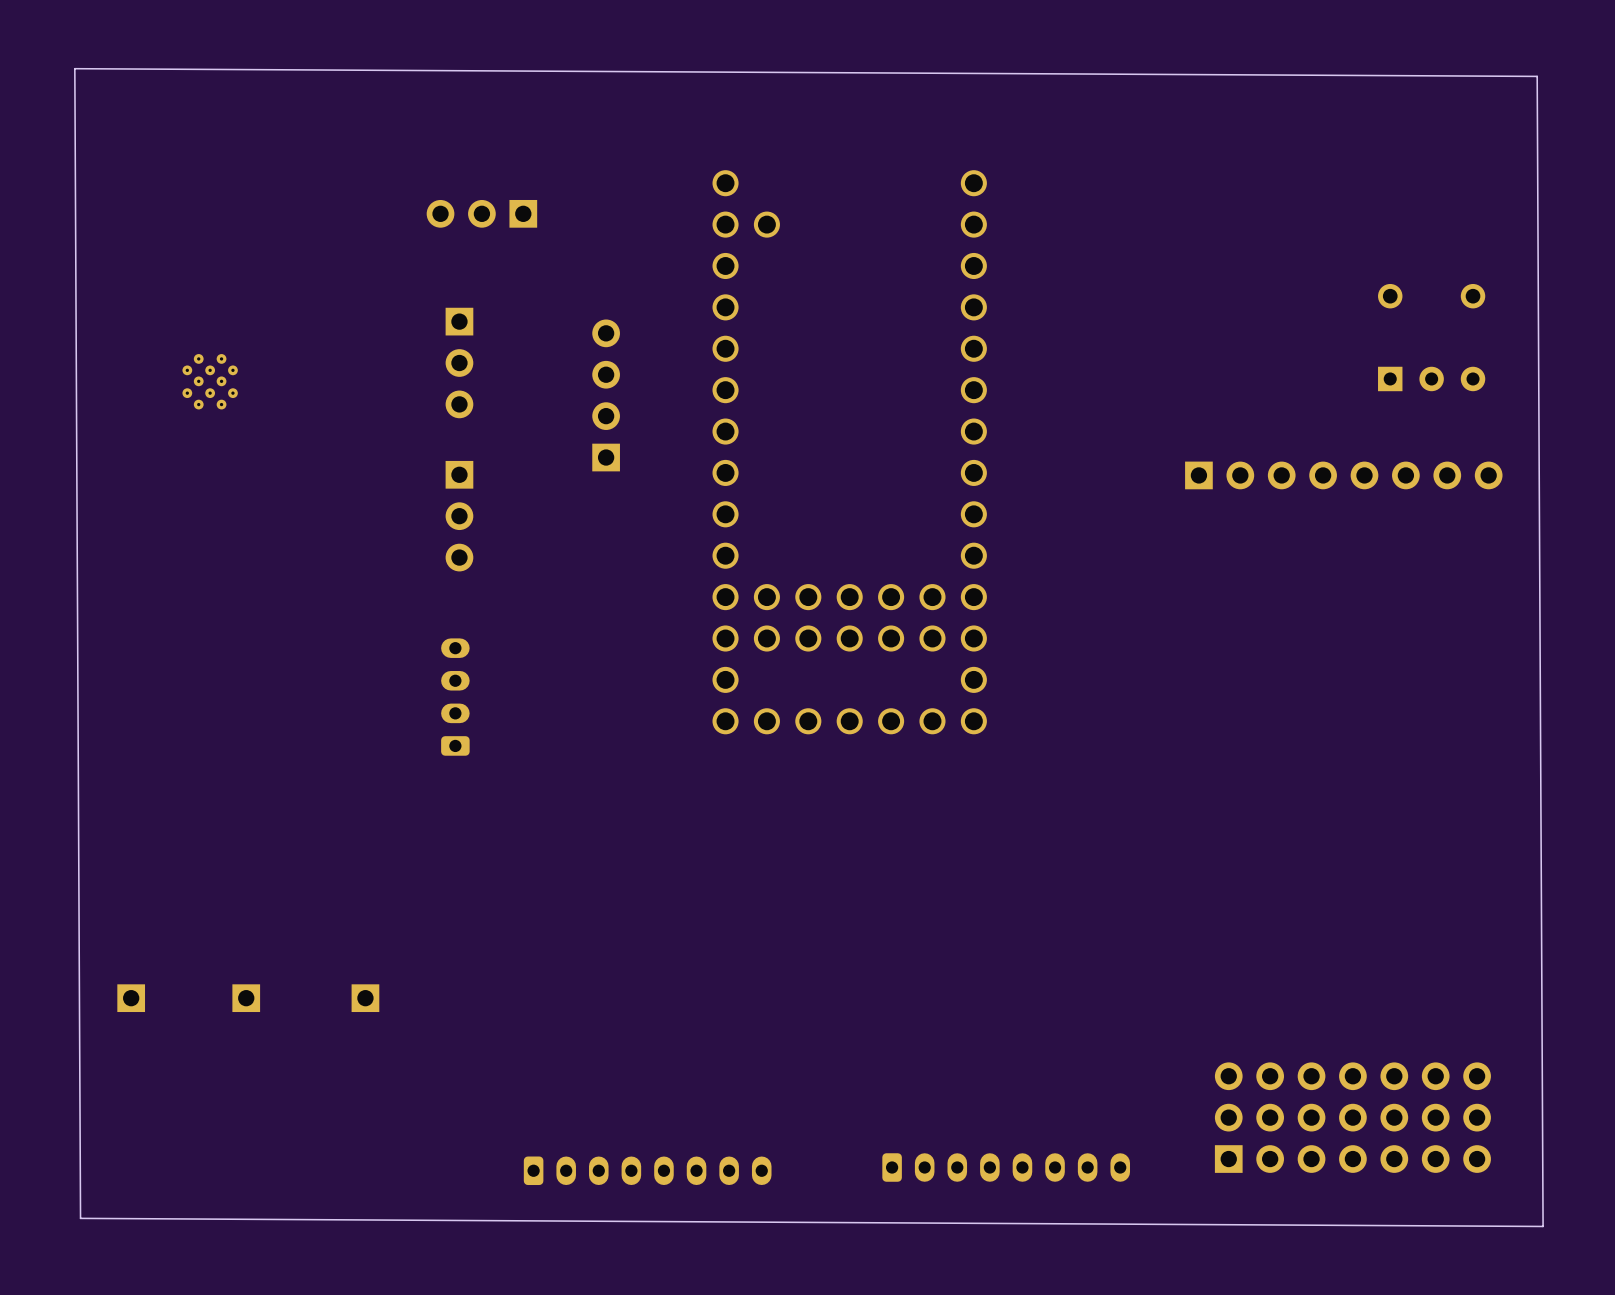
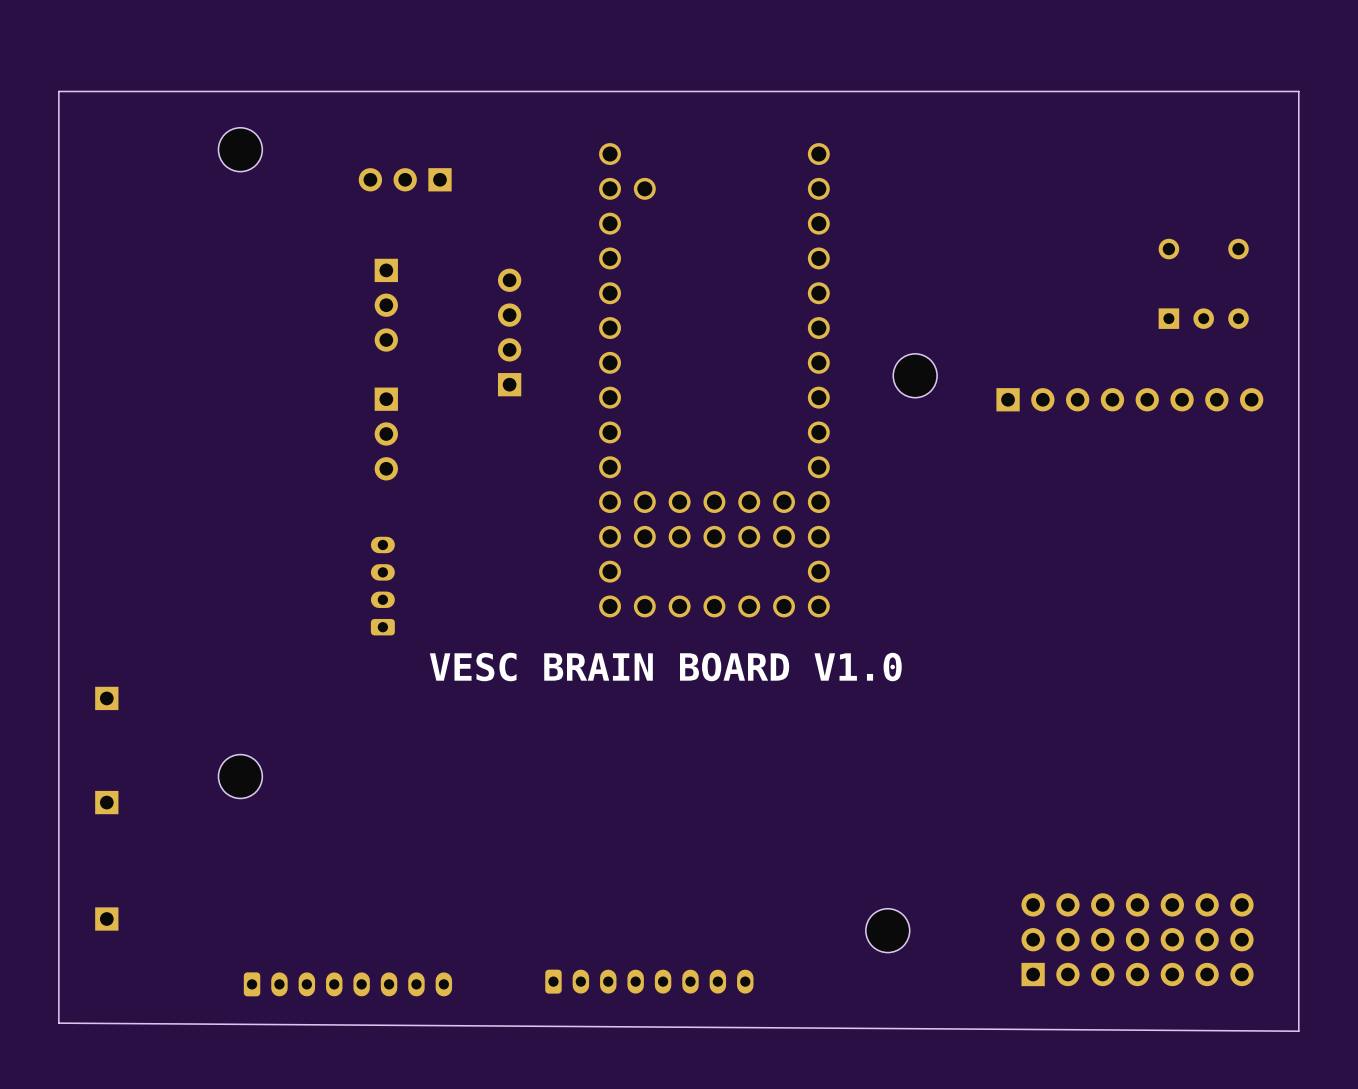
board edge: (74, 68) (80, 1218) (1543, 1226) (1537, 76) (74, 68) -> (1298, 91) (1298, 1031) (58, 1023) (58, 91) (1298, 91)
part: none -> (240, 149)
part: (210, 381) -> none
part: none -> (915, 375)
text: none -> VESC BRAIN BOARD V1.0 (665, 667)
part: none -> (106, 698)
part: none -> (240, 776)
part position: (131, 998) -> (106, 802)
part: (246, 998) -> none
part: (365, 998) -> none
part: none -> (106, 919)
part: none -> (887, 930)
part: none -> (649, 981)
part: (1006, 1167) -> none
part: none -> (347, 984)
part: (647, 1170) -> none

